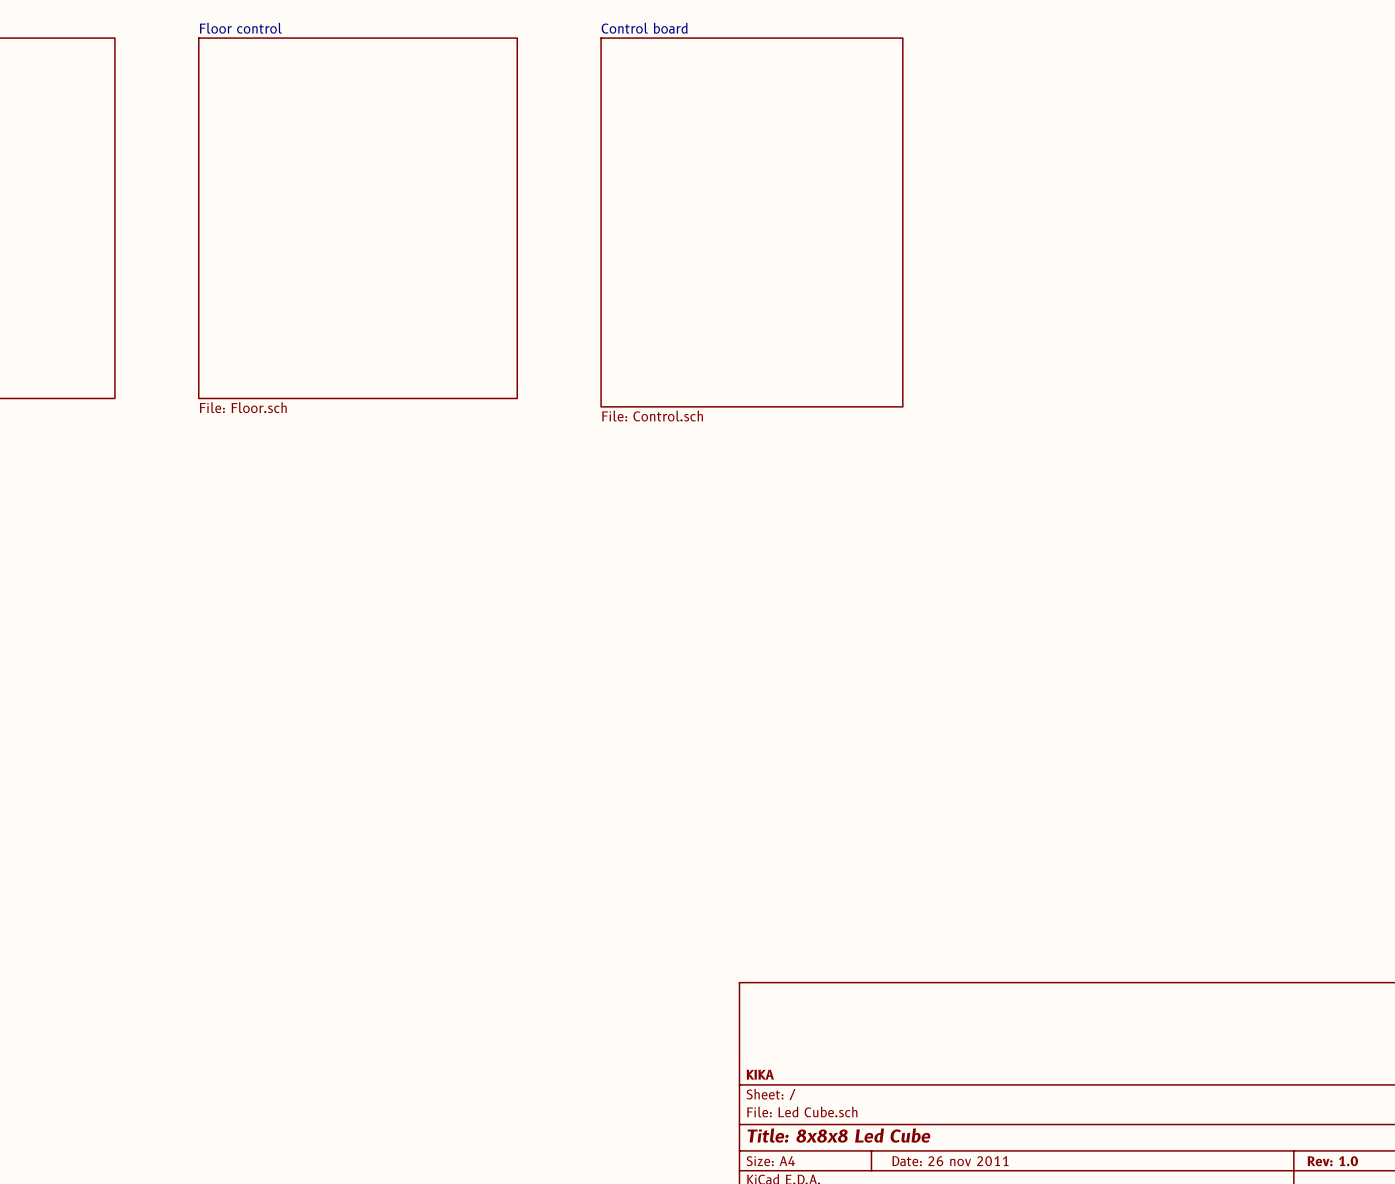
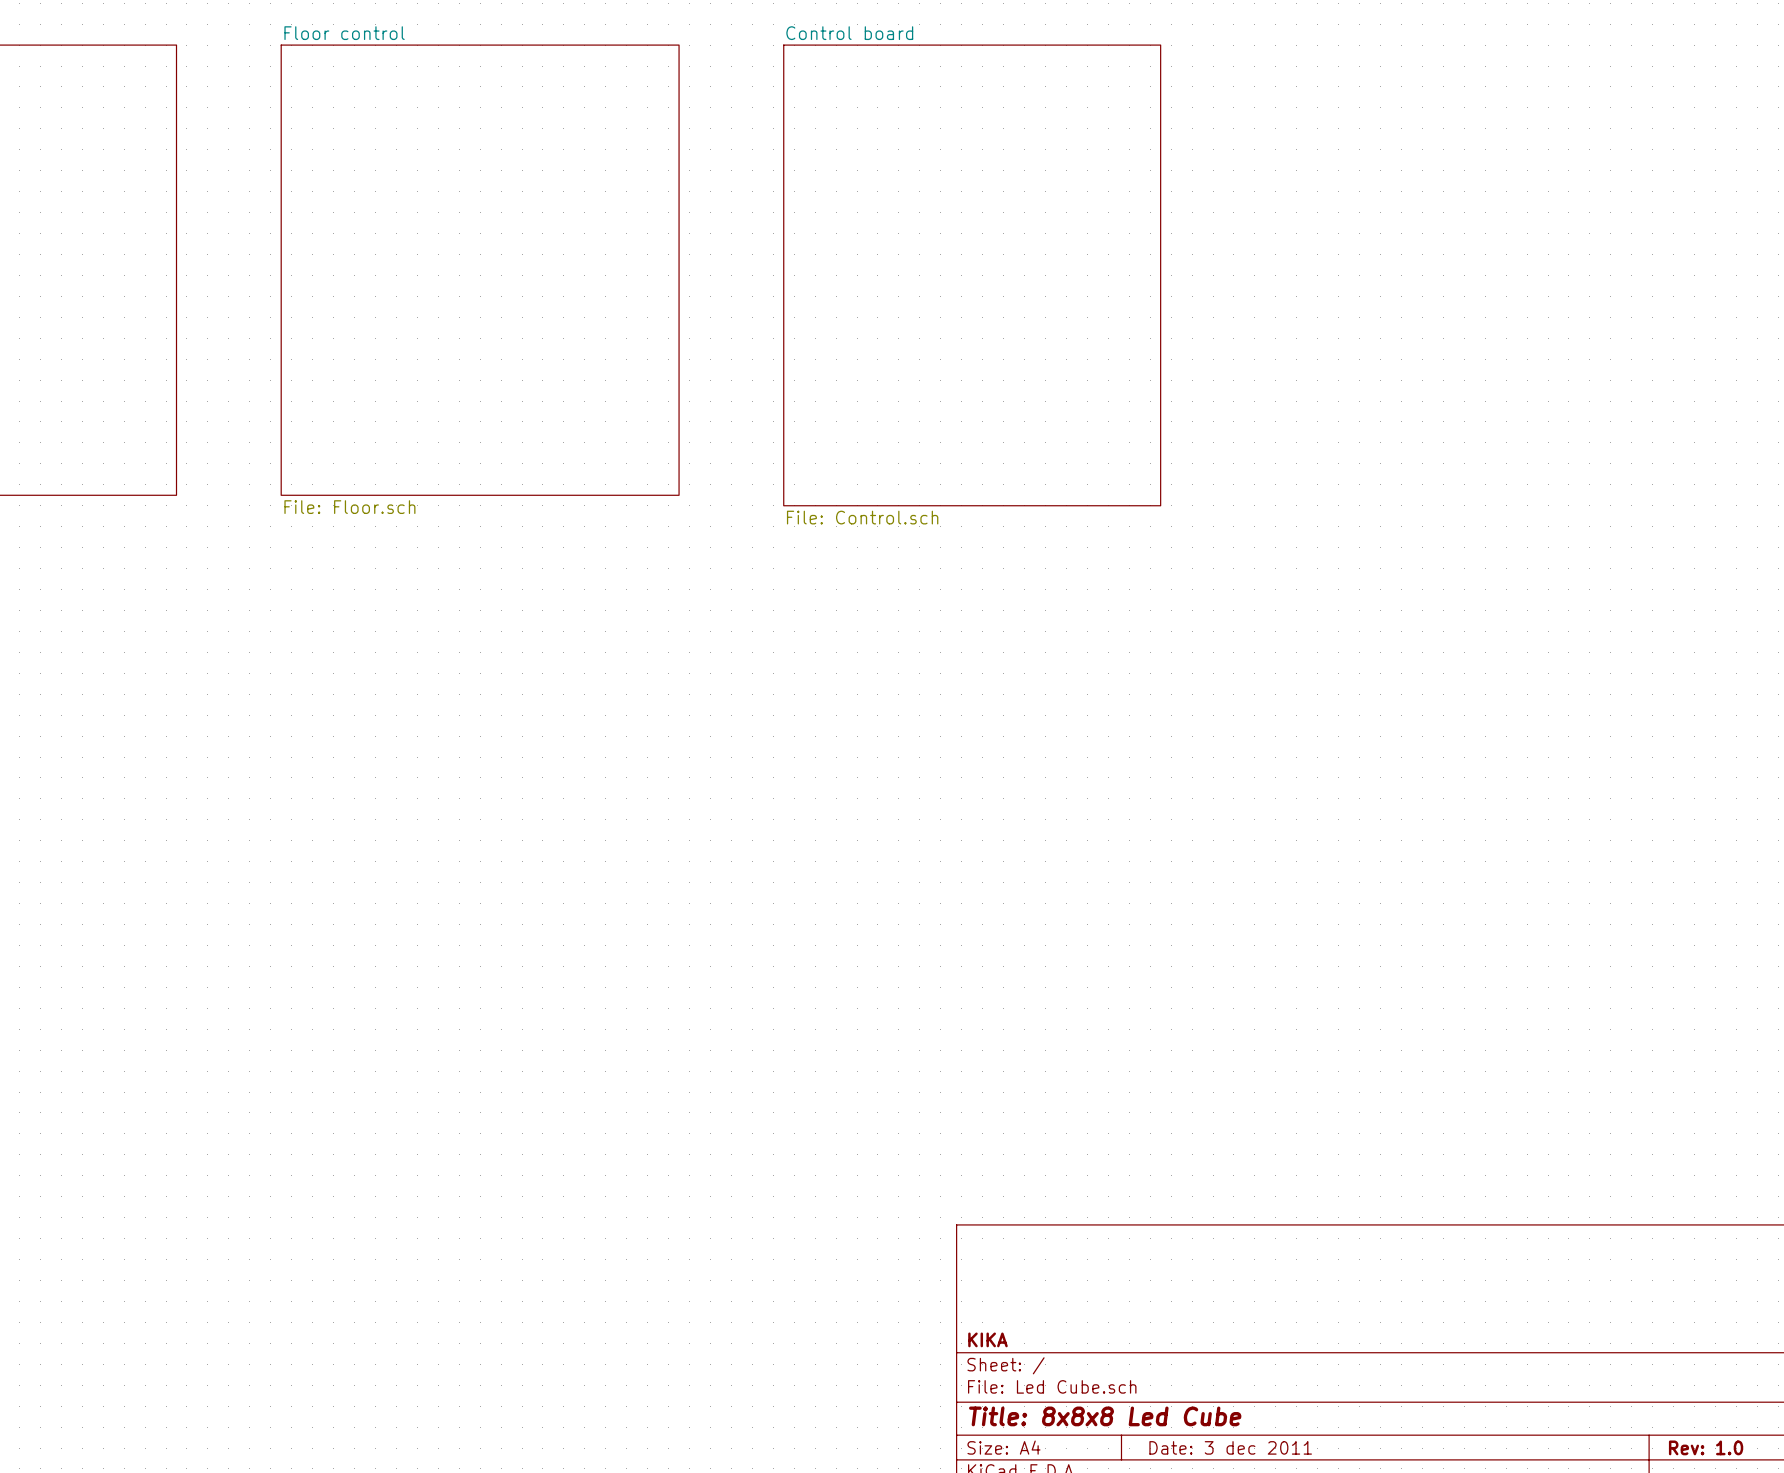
title block: Date: 26 nov 2011 (950, 1161) -> Date: 3 dec 2011 (1230, 1447)

